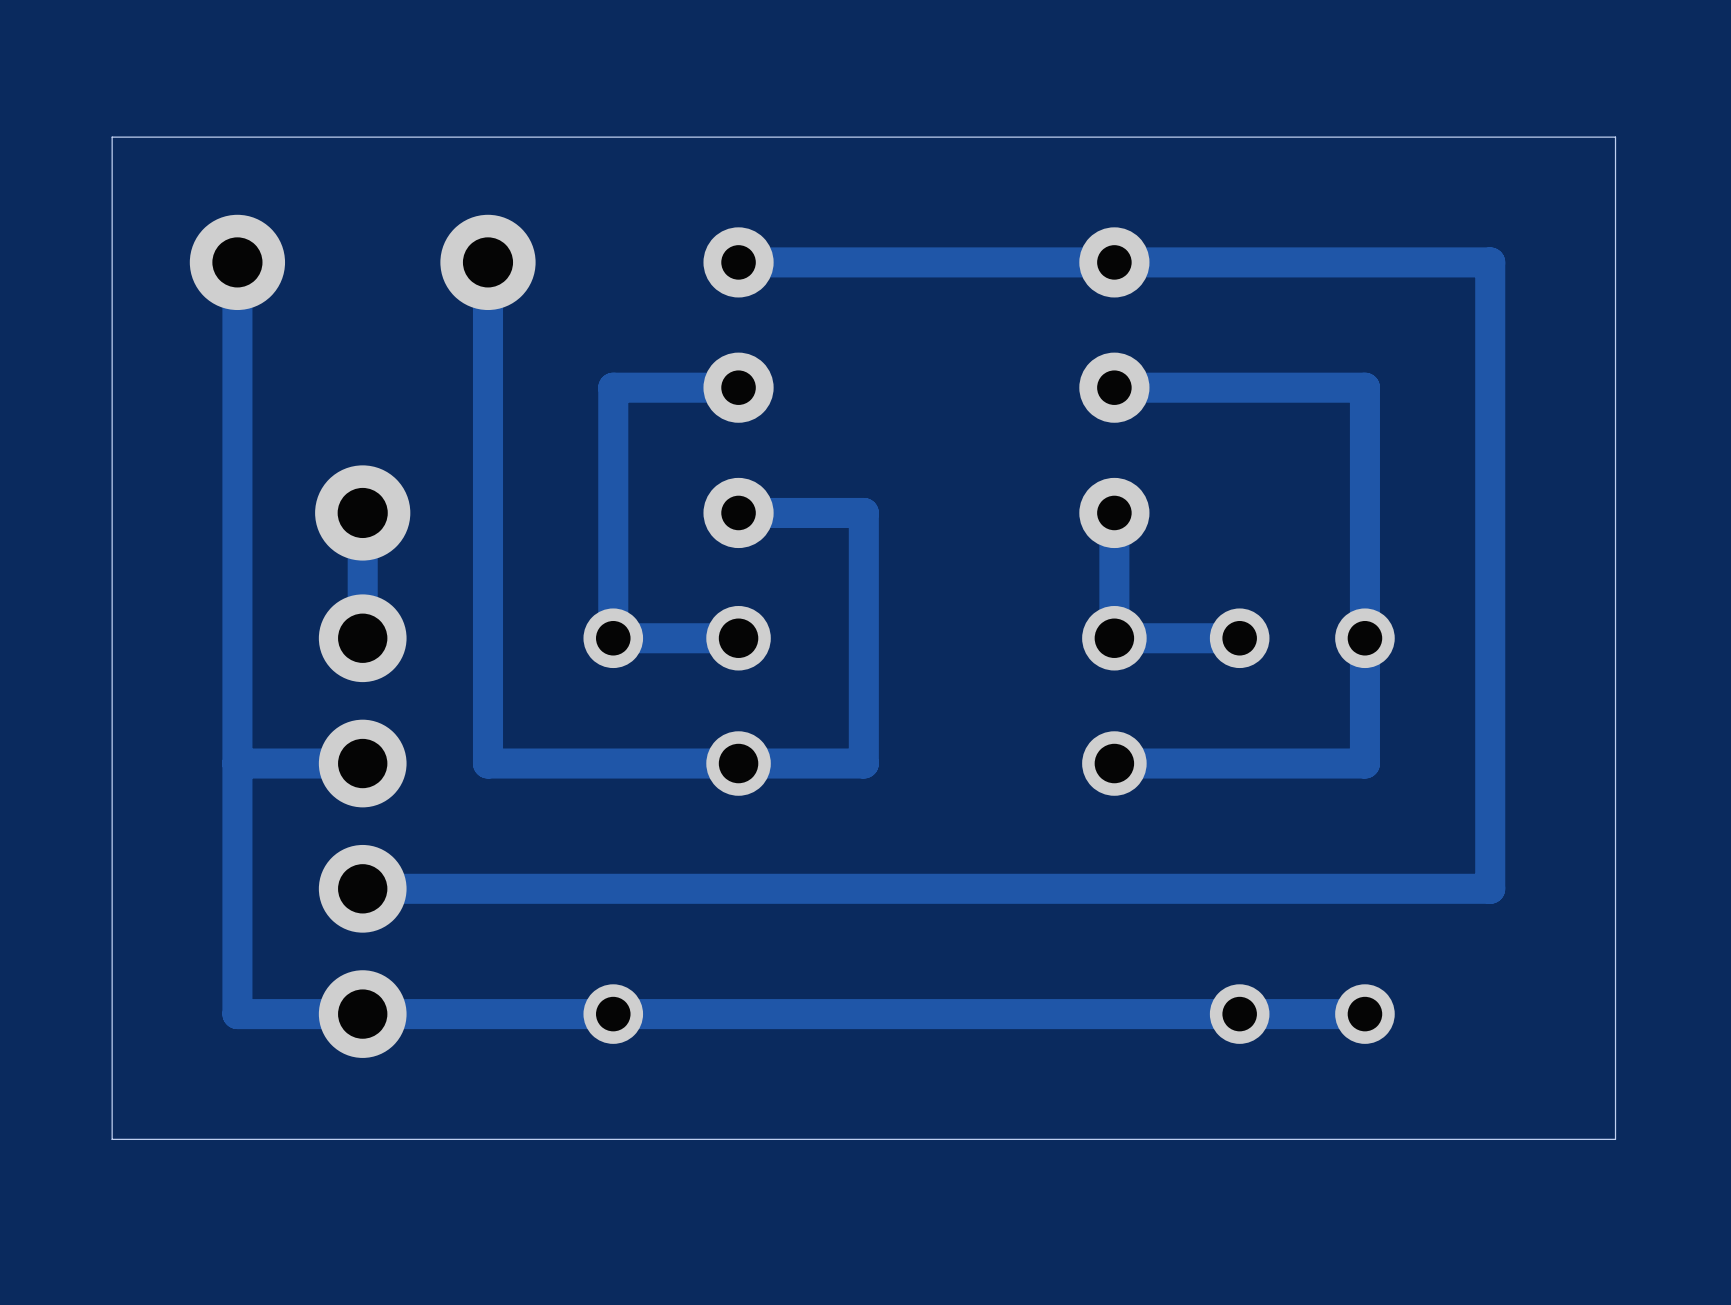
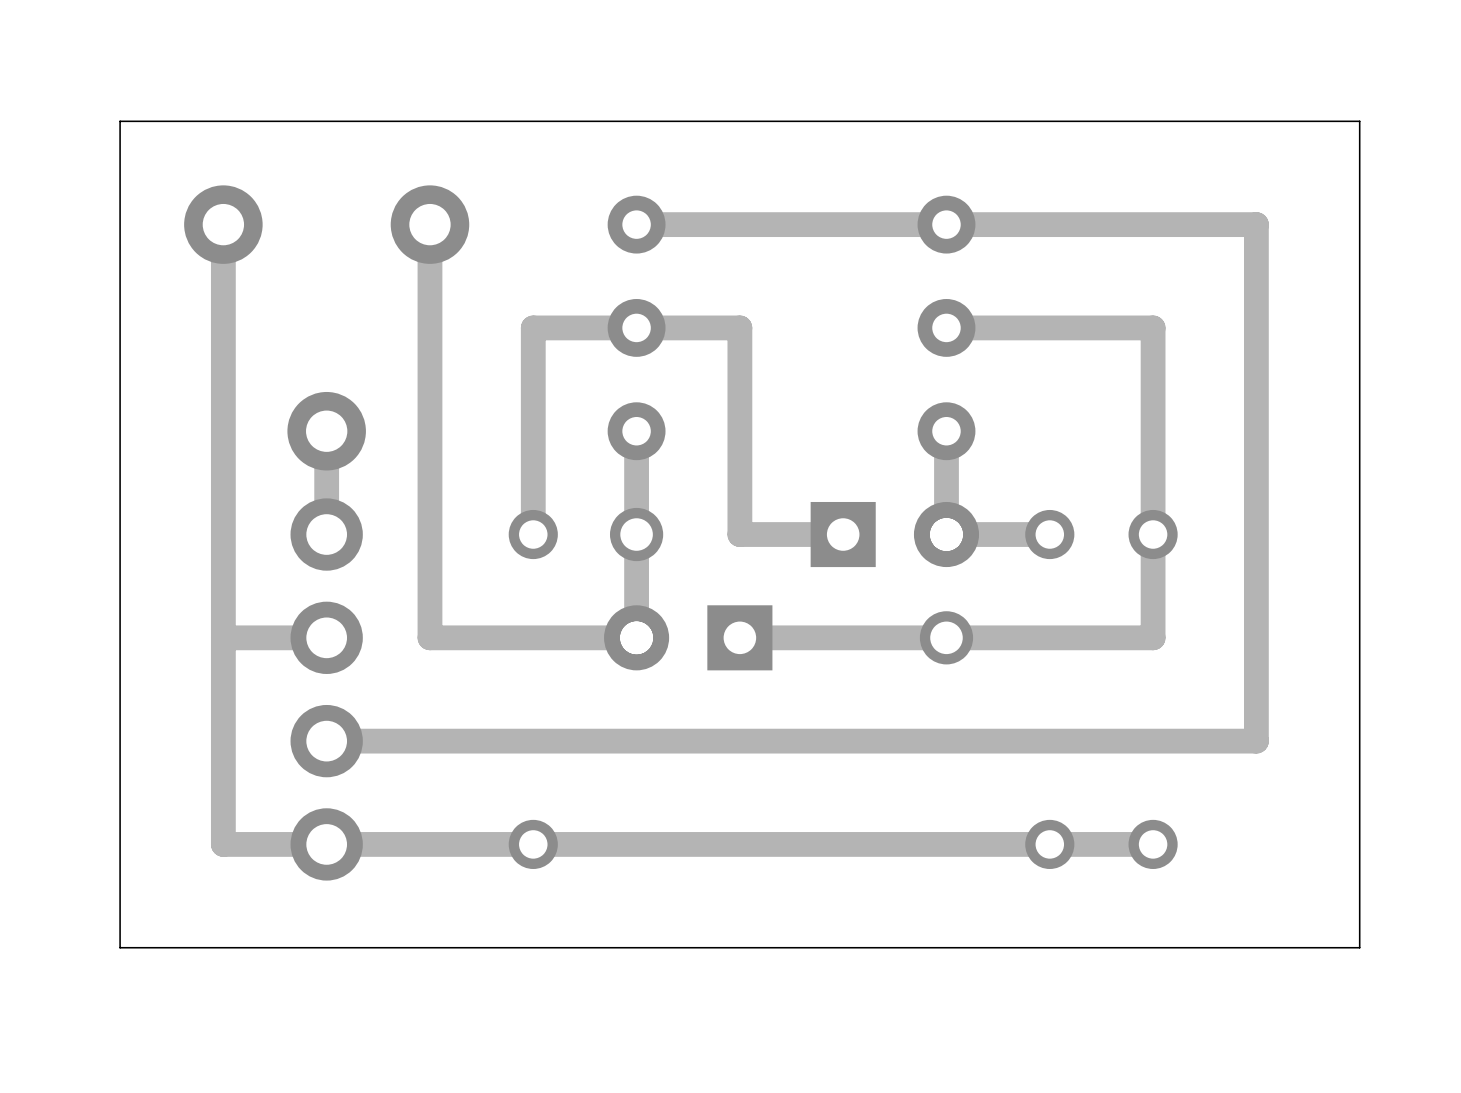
track: (863, 512) (738, 512) -> (739, 431) (739, 327) (636, 327)
track: (738, 638) (613, 638) -> (843, 534) (739, 534)
track: (863, 638) (863, 763) (738, 763) -> (636, 431) (636, 637)
part: none -> (894, 534)
part: none -> (688, 637)
track: none -> (946, 637) (739, 637)

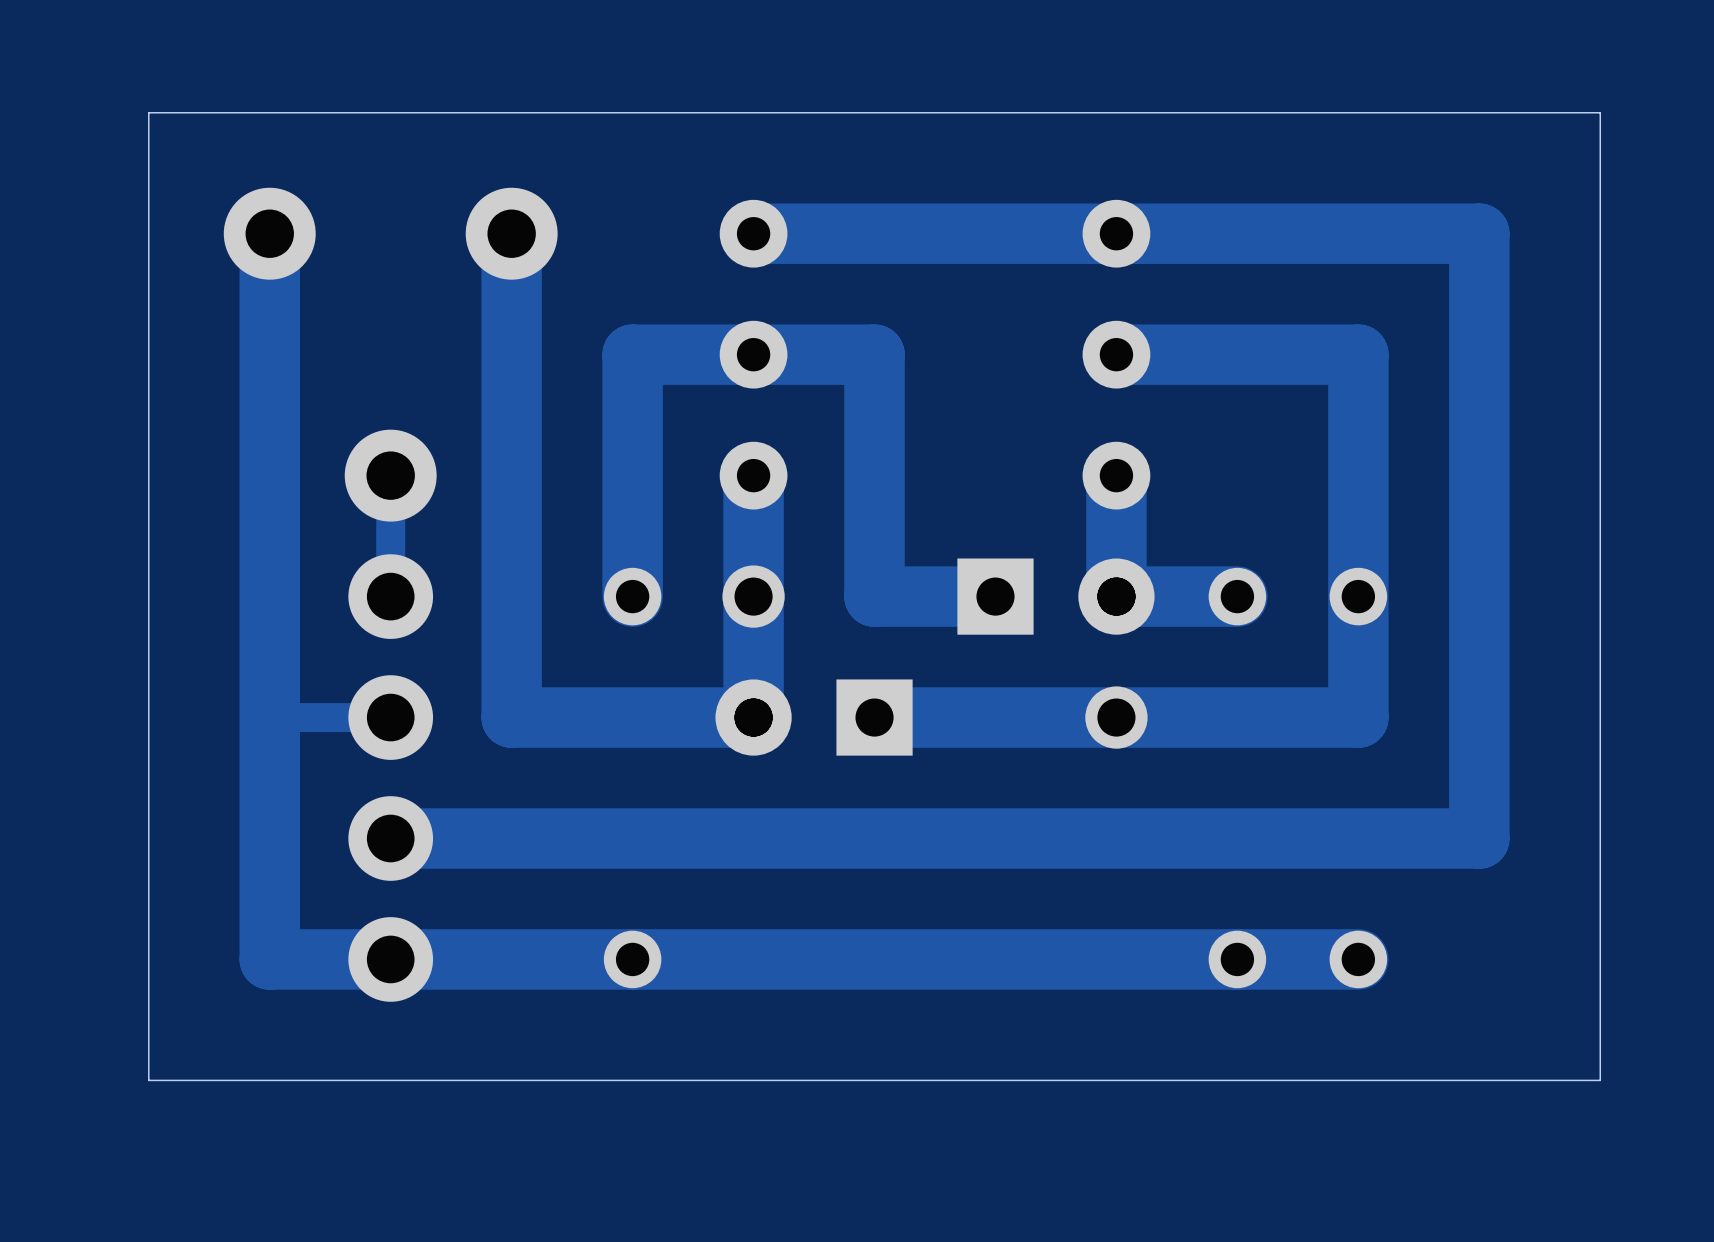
track width: thin (223, 224) (223, 844) (1153, 844) -> thick (269, 233) (269, 959) (1358, 959)
track width: thin (429, 224) (429, 637) (636, 637) (636, 431) -> thick (511, 233) (511, 717) (753, 717) (753, 475)
track width: thin (636, 224) (1256, 224) (1256, 741) (326, 741) -> thick (753, 233) (1479, 233) (1479, 838) (390, 838)
track width: thin (946, 327) (1153, 327) (1153, 637) (739, 637) -> thick (1116, 354) (1358, 354) (1358, 717) (874, 717)
track width: thin (946, 431) (946, 534) (1049, 534) -> thick (1116, 475) (1116, 596) (1237, 596)
track width: thin (843, 534) (739, 534) (739, 327) (533, 327) (533, 534) -> thick (995, 596) (874, 596) (874, 354) (632, 354) (632, 596)

